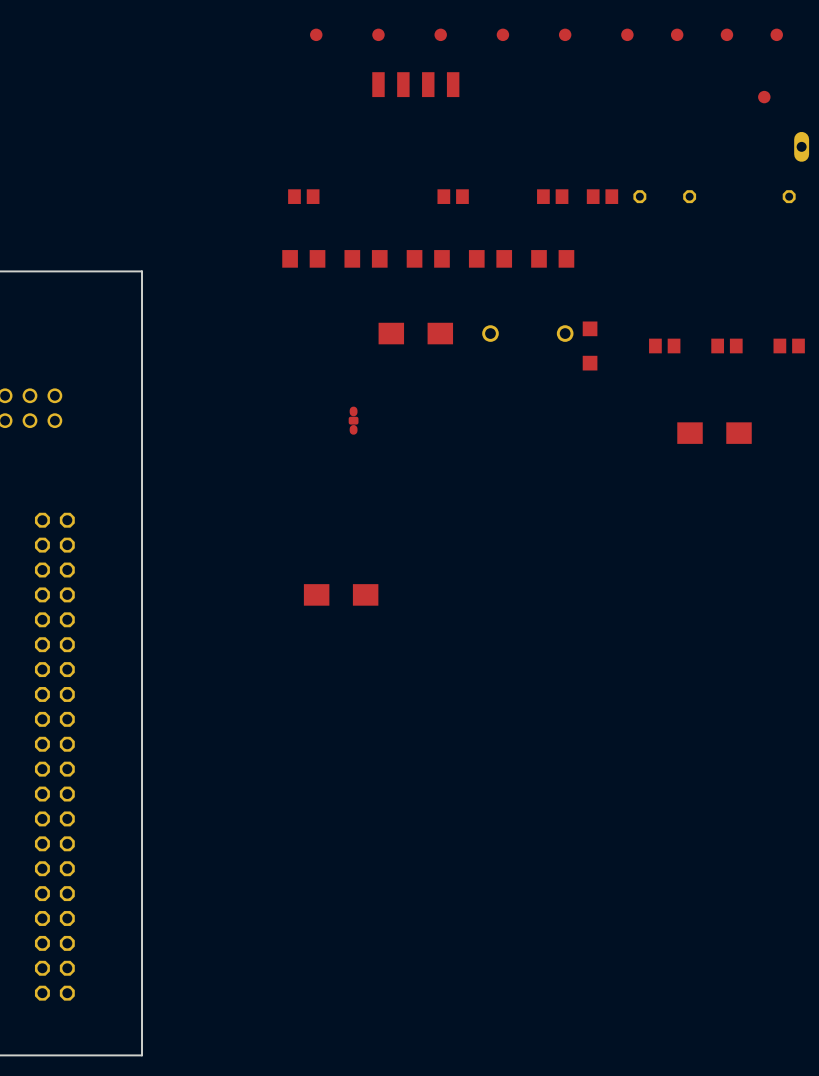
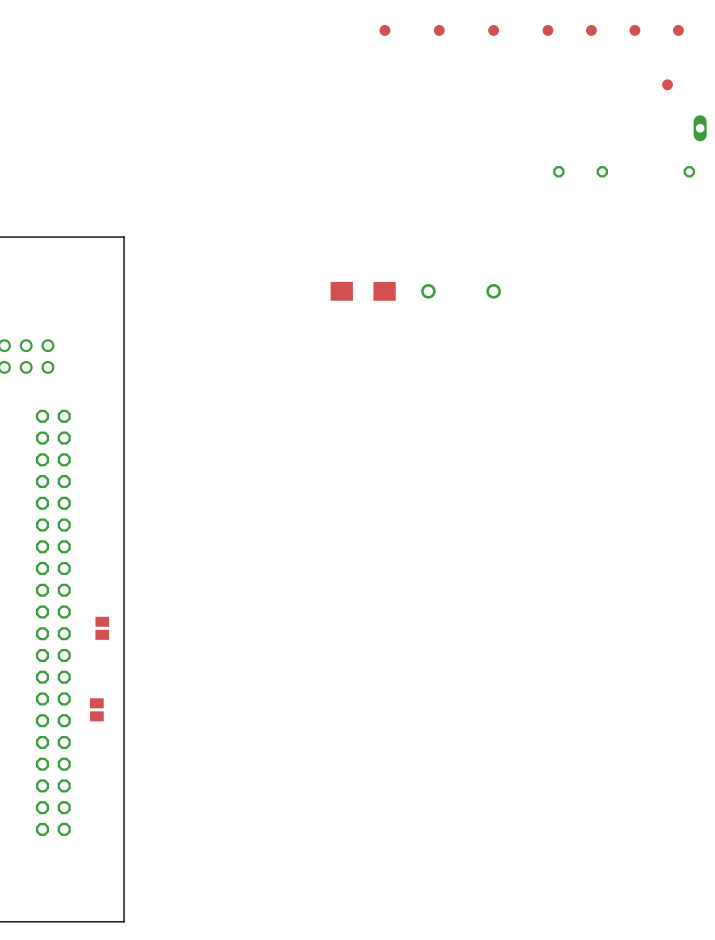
part: (316, 34) -> none
part: (378, 34) -> none
part: (390, 84) -> none
part: (440, 84) -> none
part: (303, 196) -> none
part: (453, 196) -> none
part: (552, 196) -> none
part: (602, 196) -> none
part: (303, 258) -> none
part: (366, 258) -> none
part: (428, 258) -> none
part: (490, 258) -> none
part: (552, 258) -> none
part: (590, 345) -> none
part: (664, 345) -> none
part: (726, 345) -> none
part: (789, 345) -> none
part: (353, 420) -> none
part: (714, 433) -> none
part: (341, 594) -> none
part: none -> (102, 628)
part position: (54, 756) -> (53, 622)
part: none -> (96, 709)

